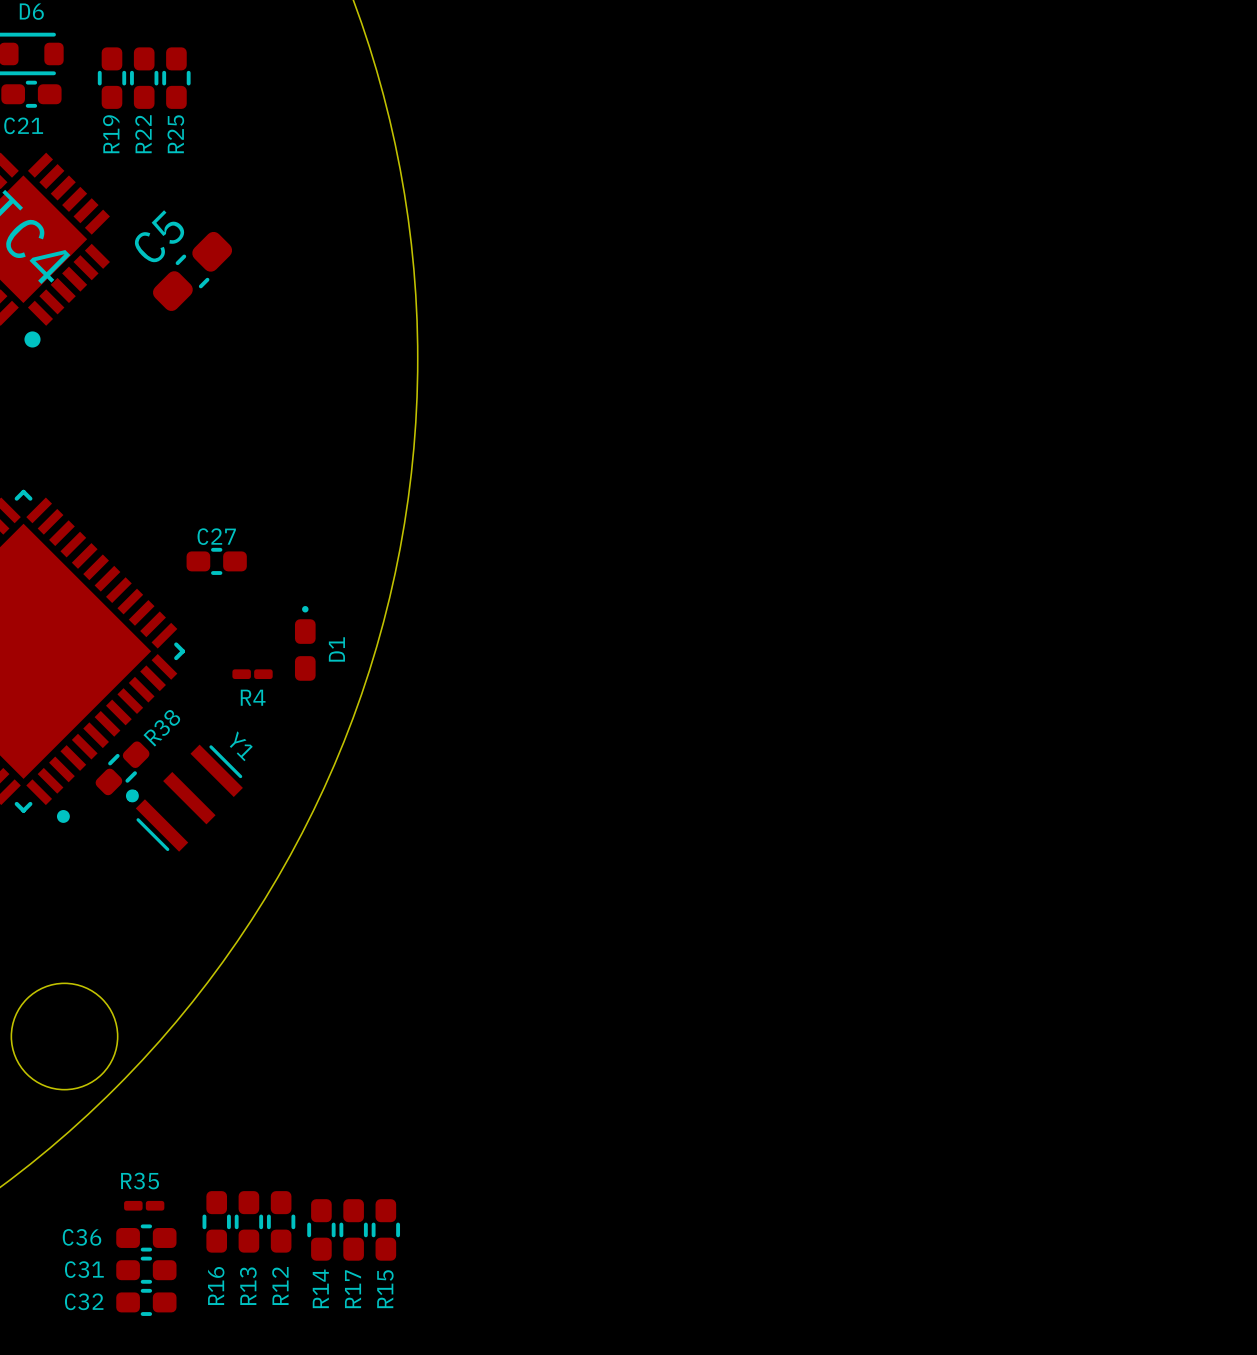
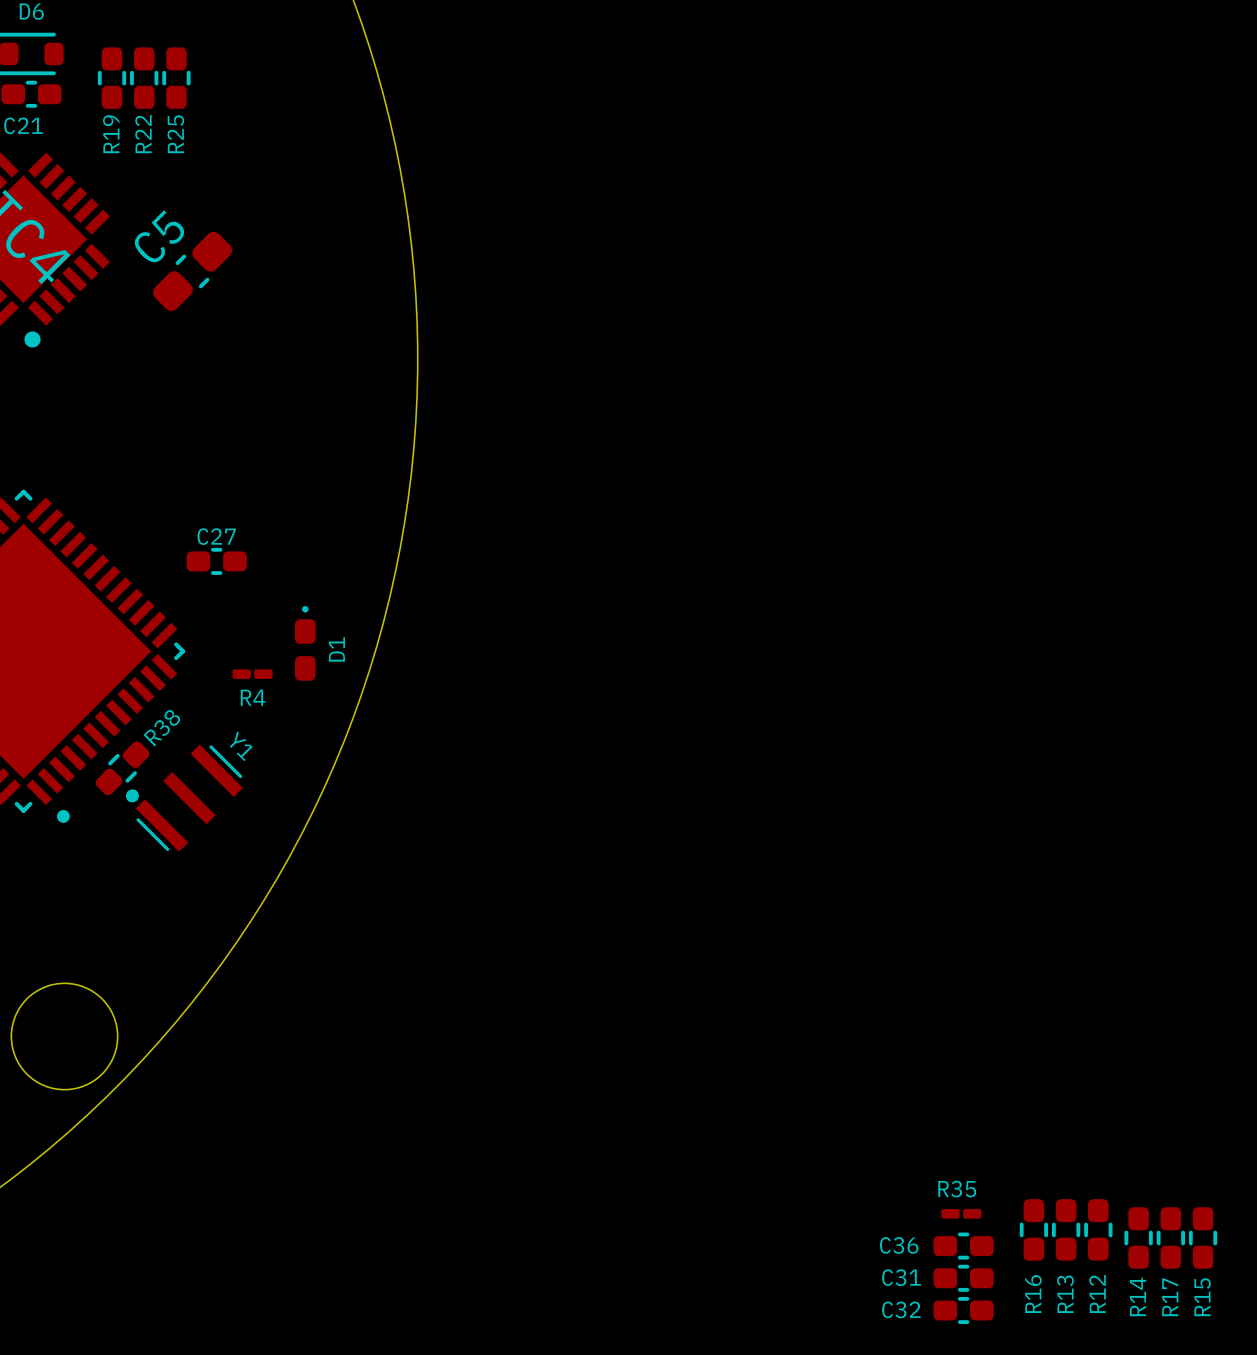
R35 position: (144, 1205) -> (961, 1213)
R13 position: (216, 1221) -> (1033, 1229)
R16 position: (248, 1221) -> (1066, 1229)
R12 position: (281, 1221) -> (1098, 1229)
R14 position: (321, 1229) -> (1138, 1237)
R17 position: (353, 1229) -> (1170, 1237)
R15 position: (385, 1229) -> (1203, 1237)
C36 position: (146, 1237) -> (963, 1246)
C31 position: (146, 1270) -> (963, 1278)
C32 position: (146, 1302) -> (963, 1310)

